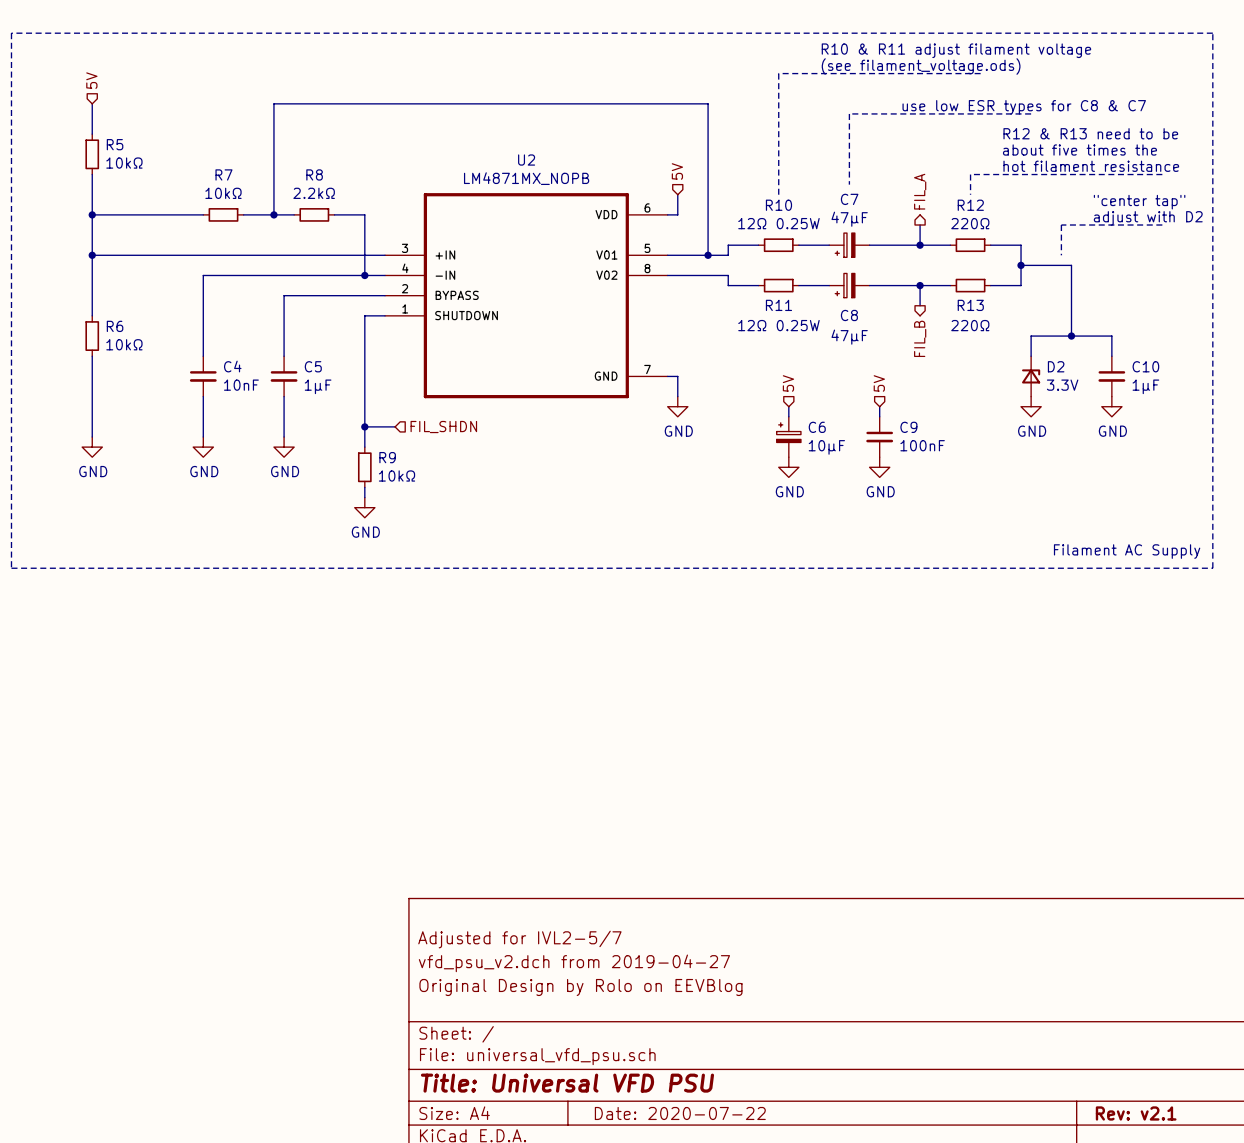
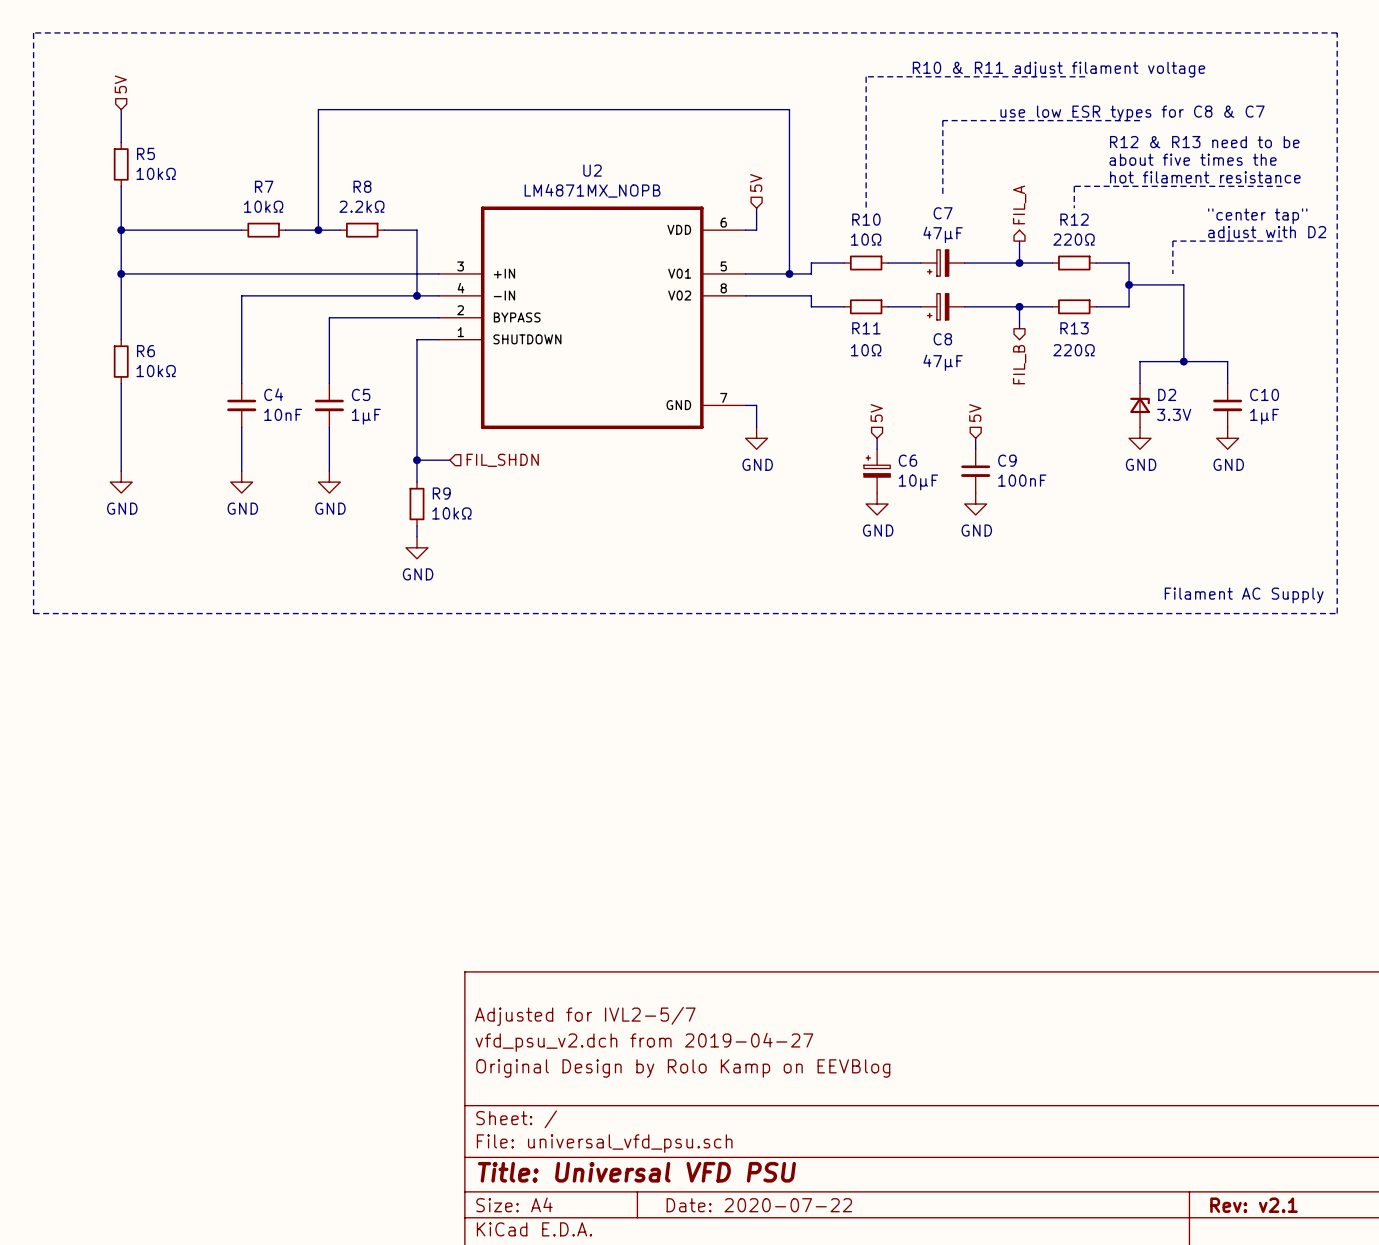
text: R10 & R11 adjust filament voltage (956, 50) -> none
text: (see filament_voltage.ods) (921, 66) -> R10 & R11 adjust filament voltage (1058, 69)
R10 value: 12Ω 0.25W (778, 223) -> 10Ω (866, 239)
R11 value: 12Ω 0.25W (778, 325) -> 10Ω (866, 350)
title block: Original Design by Rolo on EEVBlog (580, 987) -> Original Design by Rolo Kamp on EEVBlog (683, 1068)

